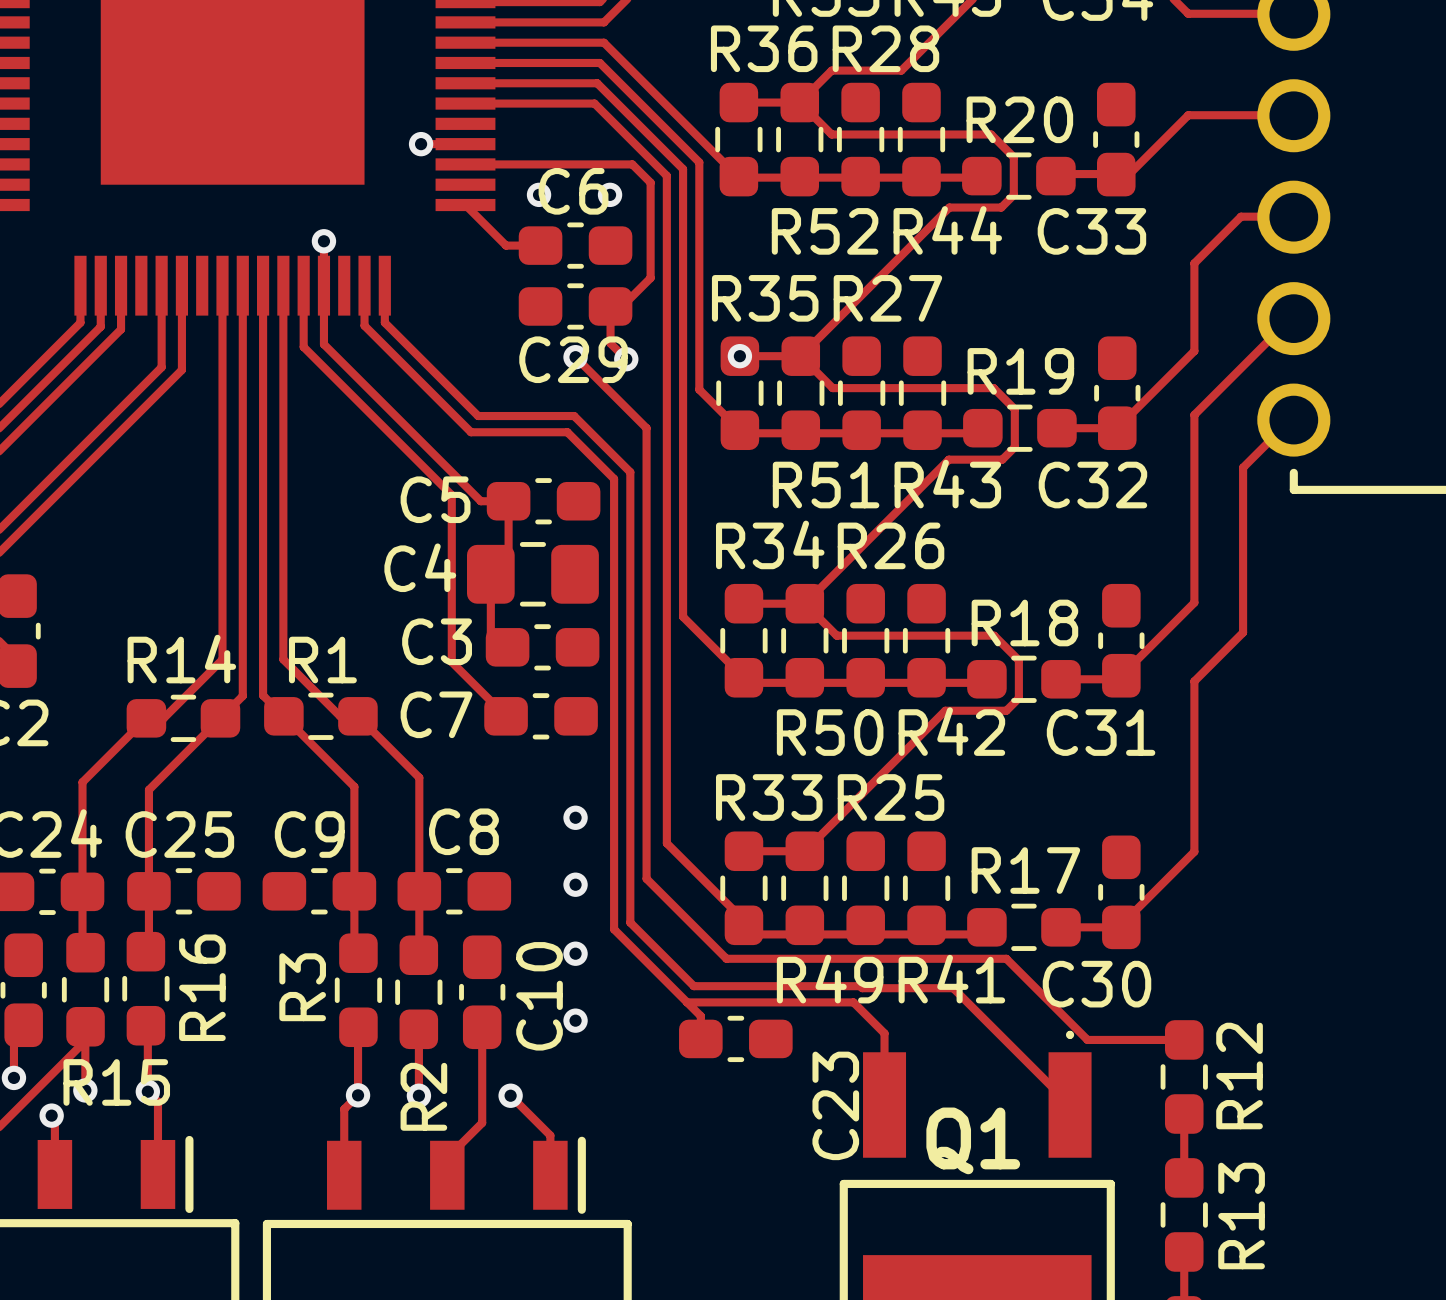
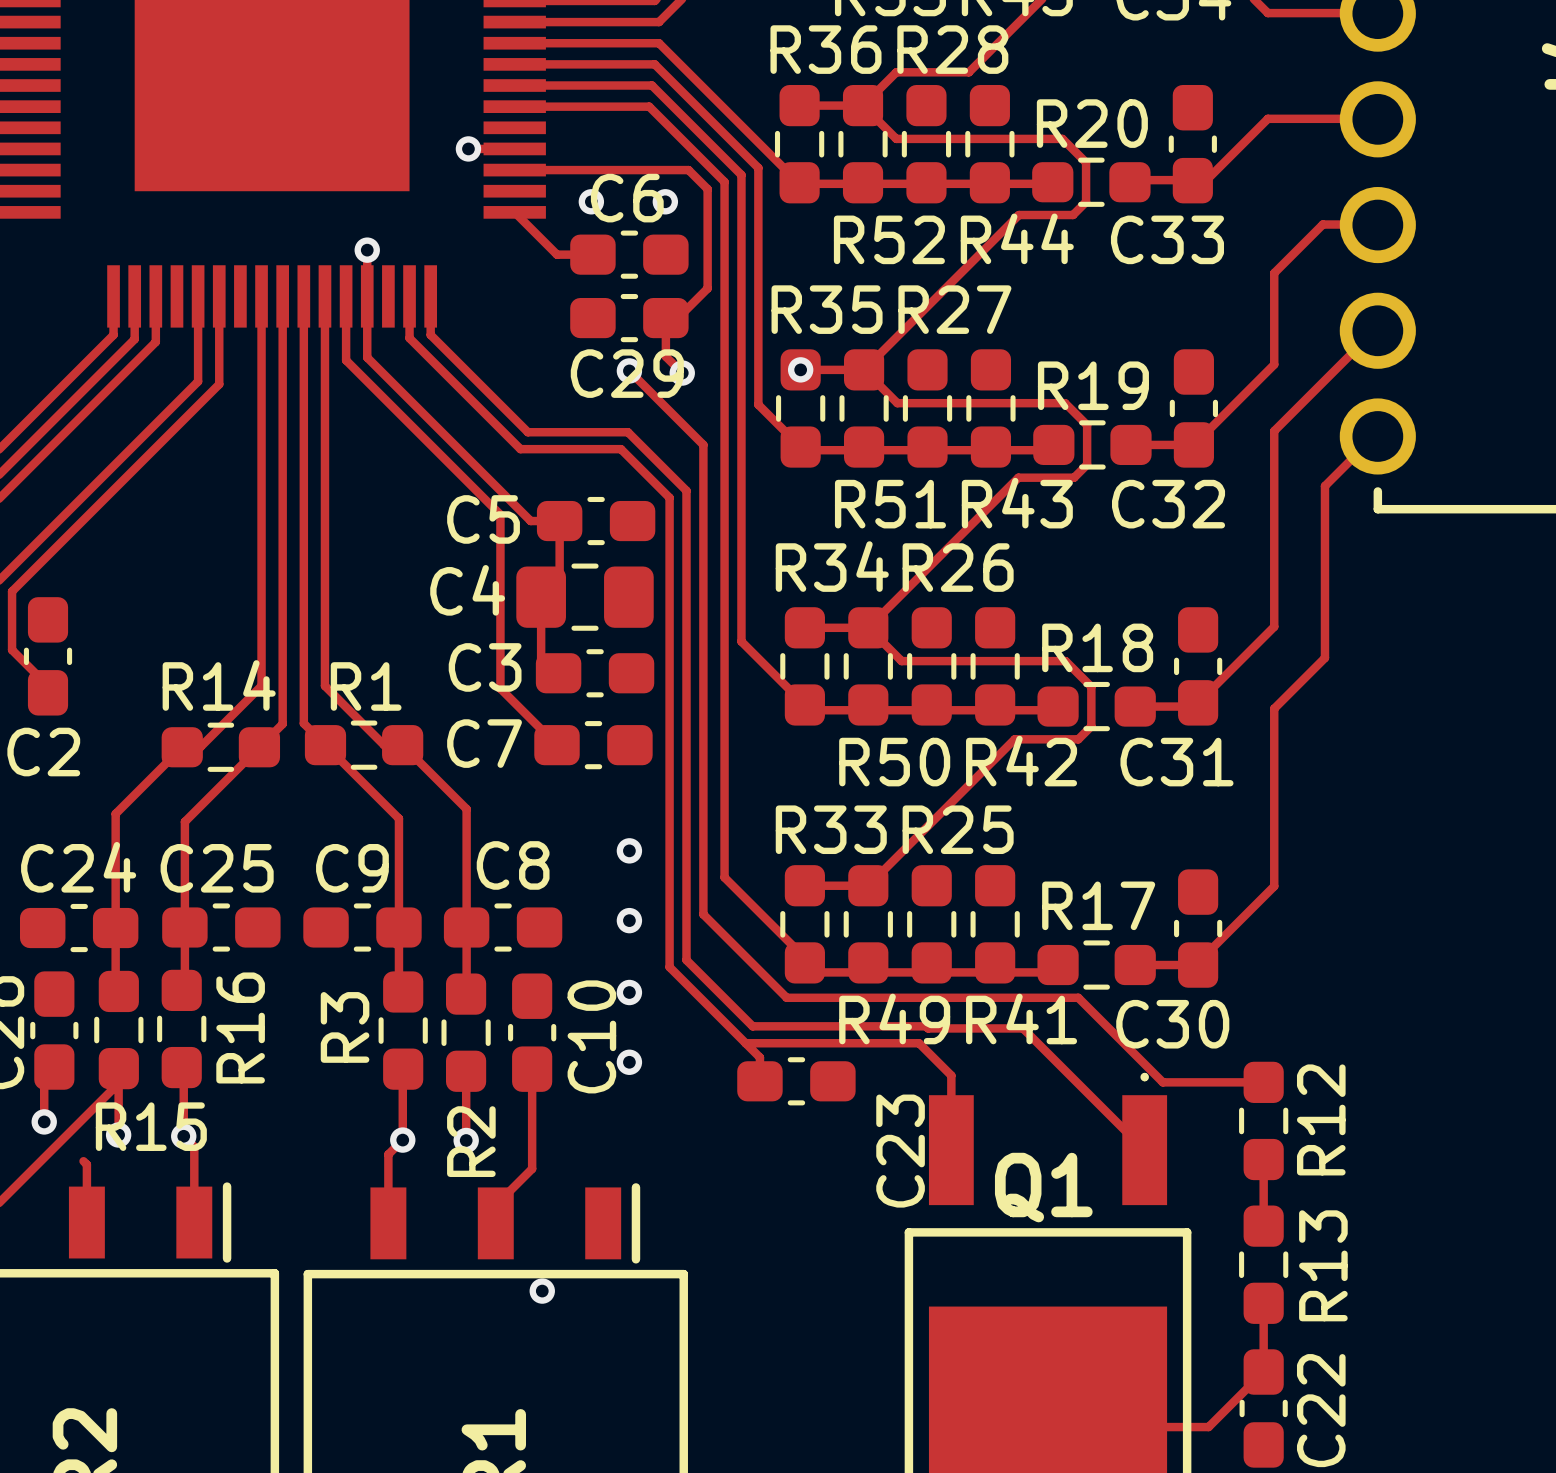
track: (510, 1095) (550, 1135) (550, 1175) -> none
via position: (510, 1095) -> (542, 1291)
via: (51, 1115) -> none

